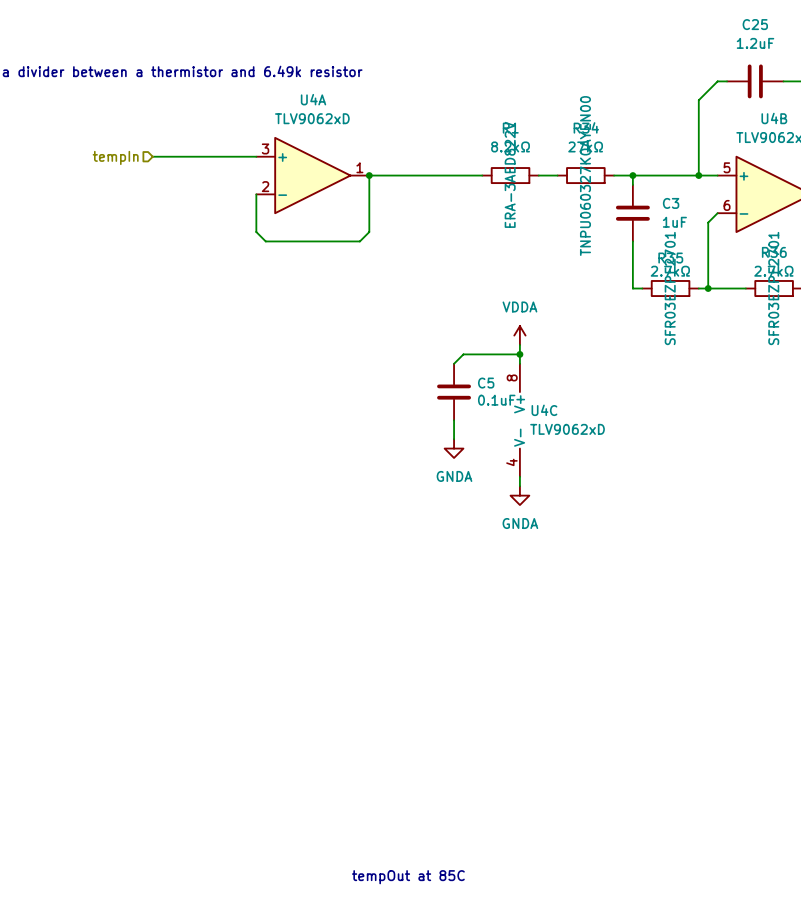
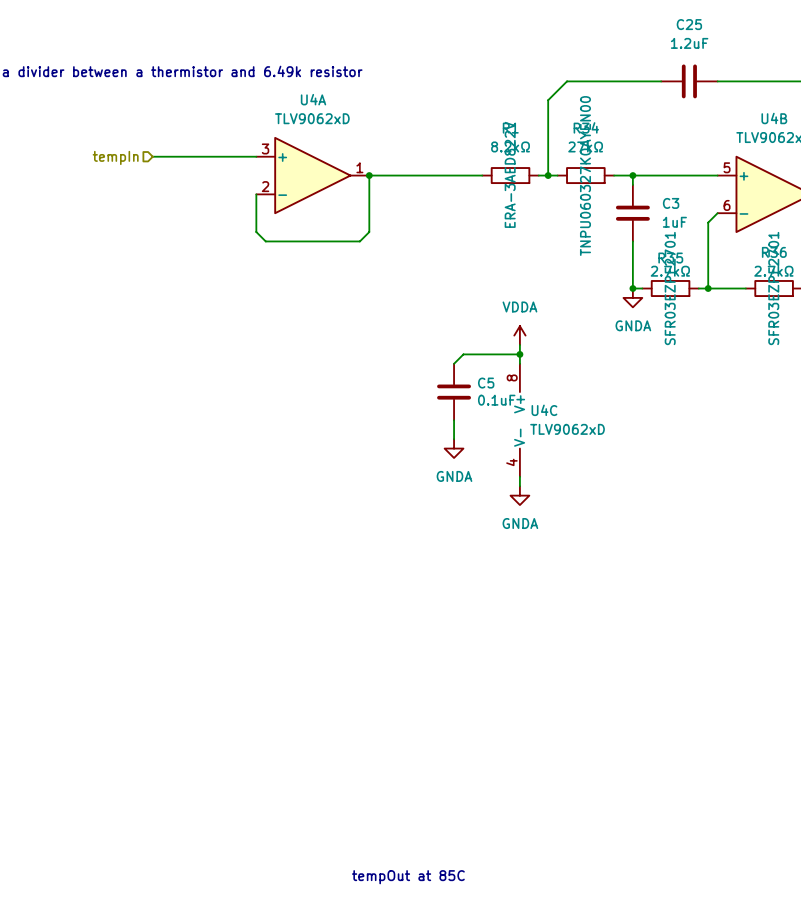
wire: none -> (661, 81) (567, 81) (548, 100) (548, 175)
wire: (717, 81) (698, 100) (698, 175) -> none
C25 position: (755, 81) -> (689, 81)
junction: none -> (548, 175)
junction: (698, 175) -> none
junction: none -> (632, 288)
power symbol: none -> GNDA (632, 297)

